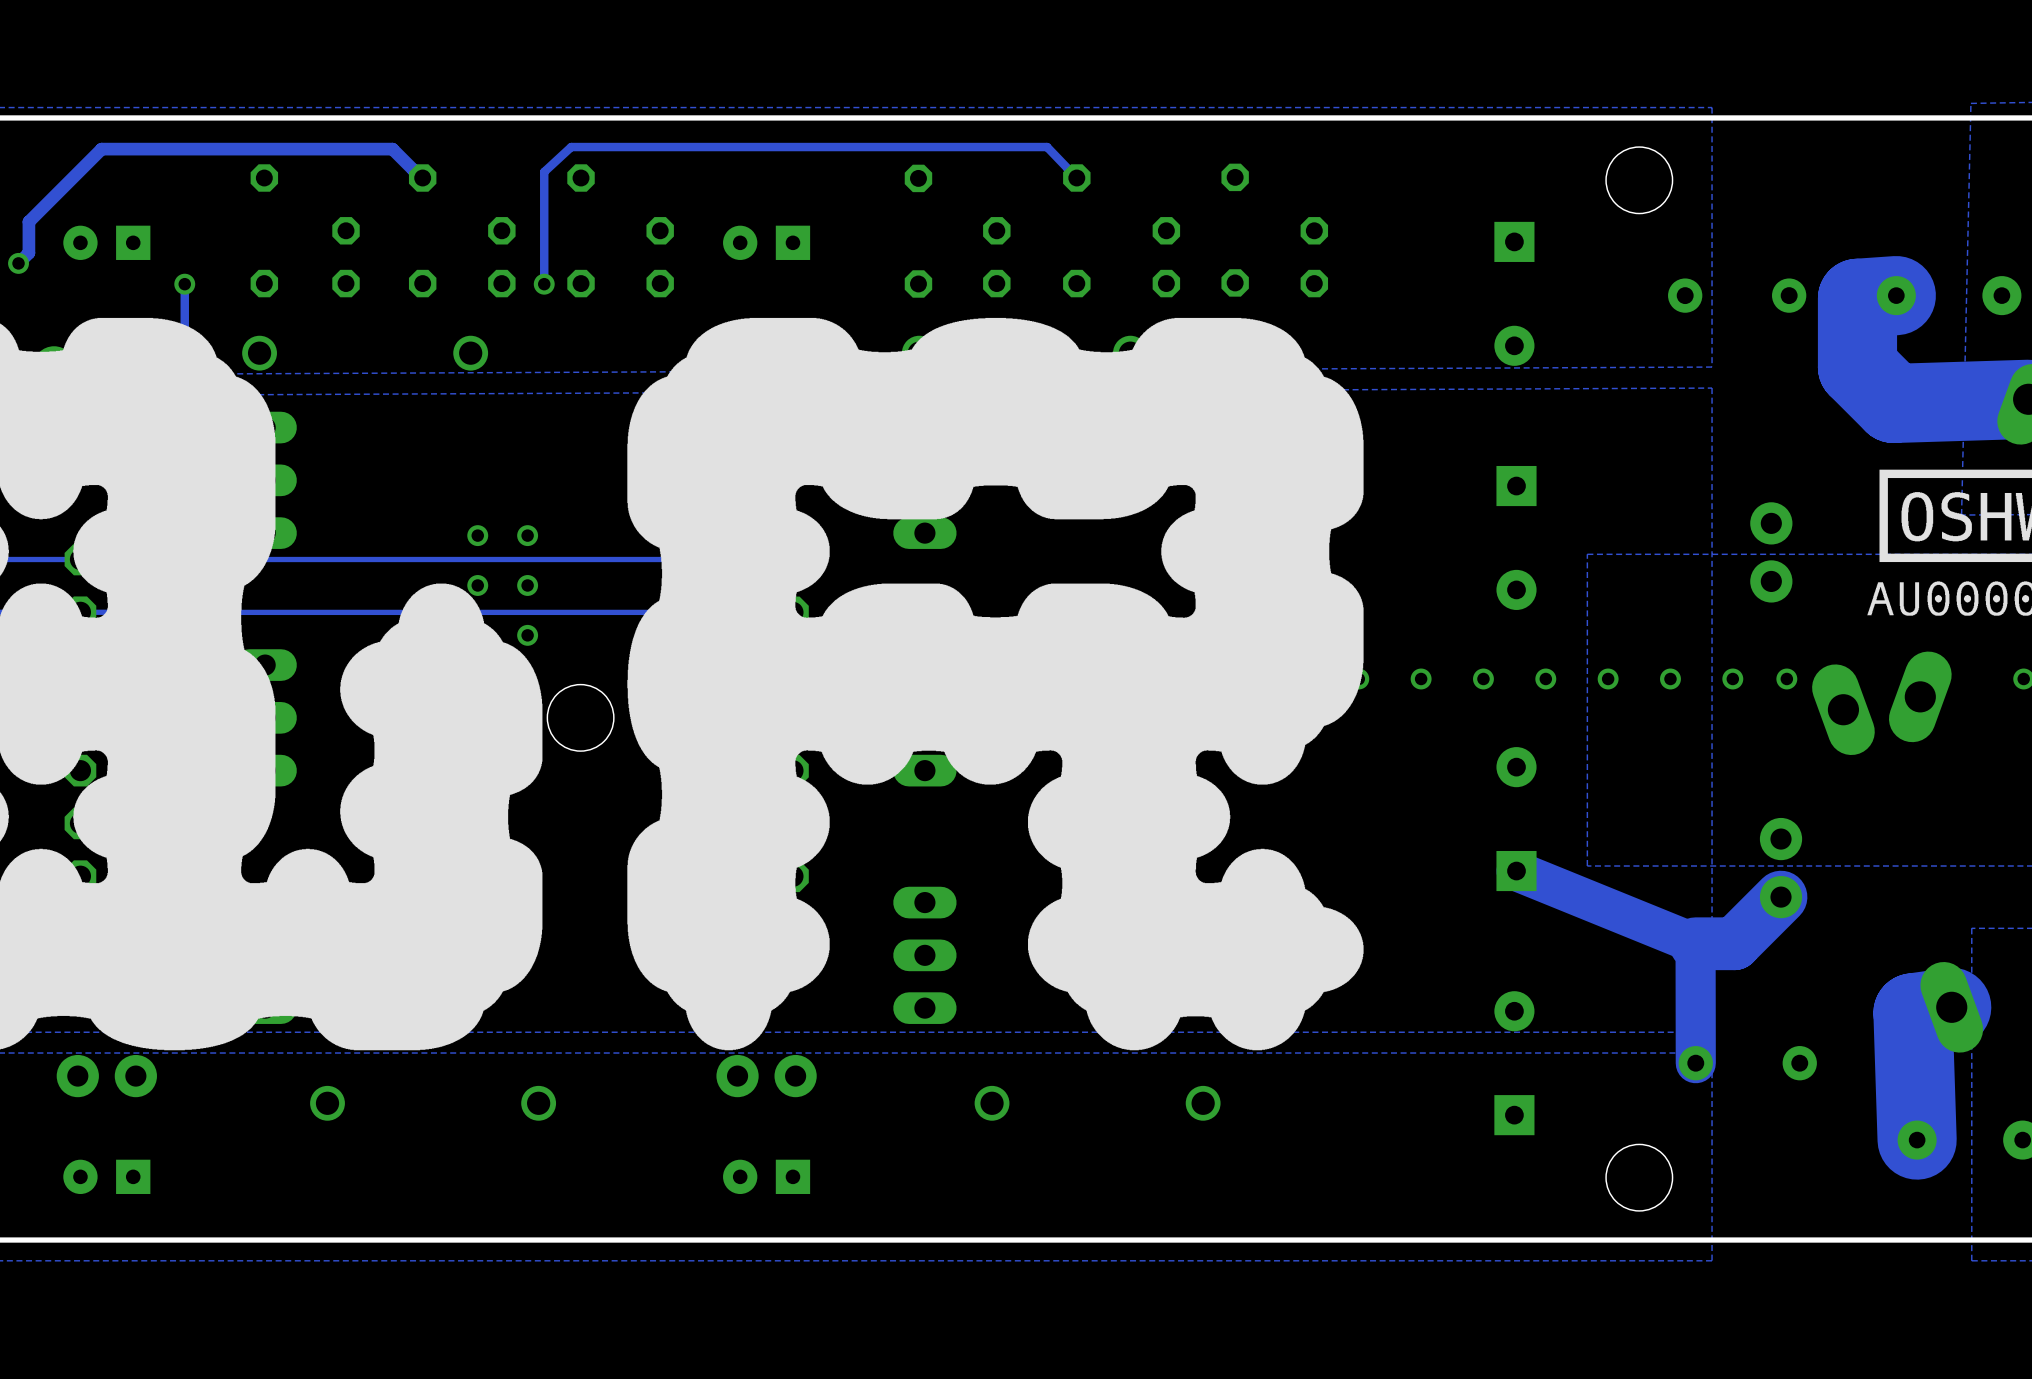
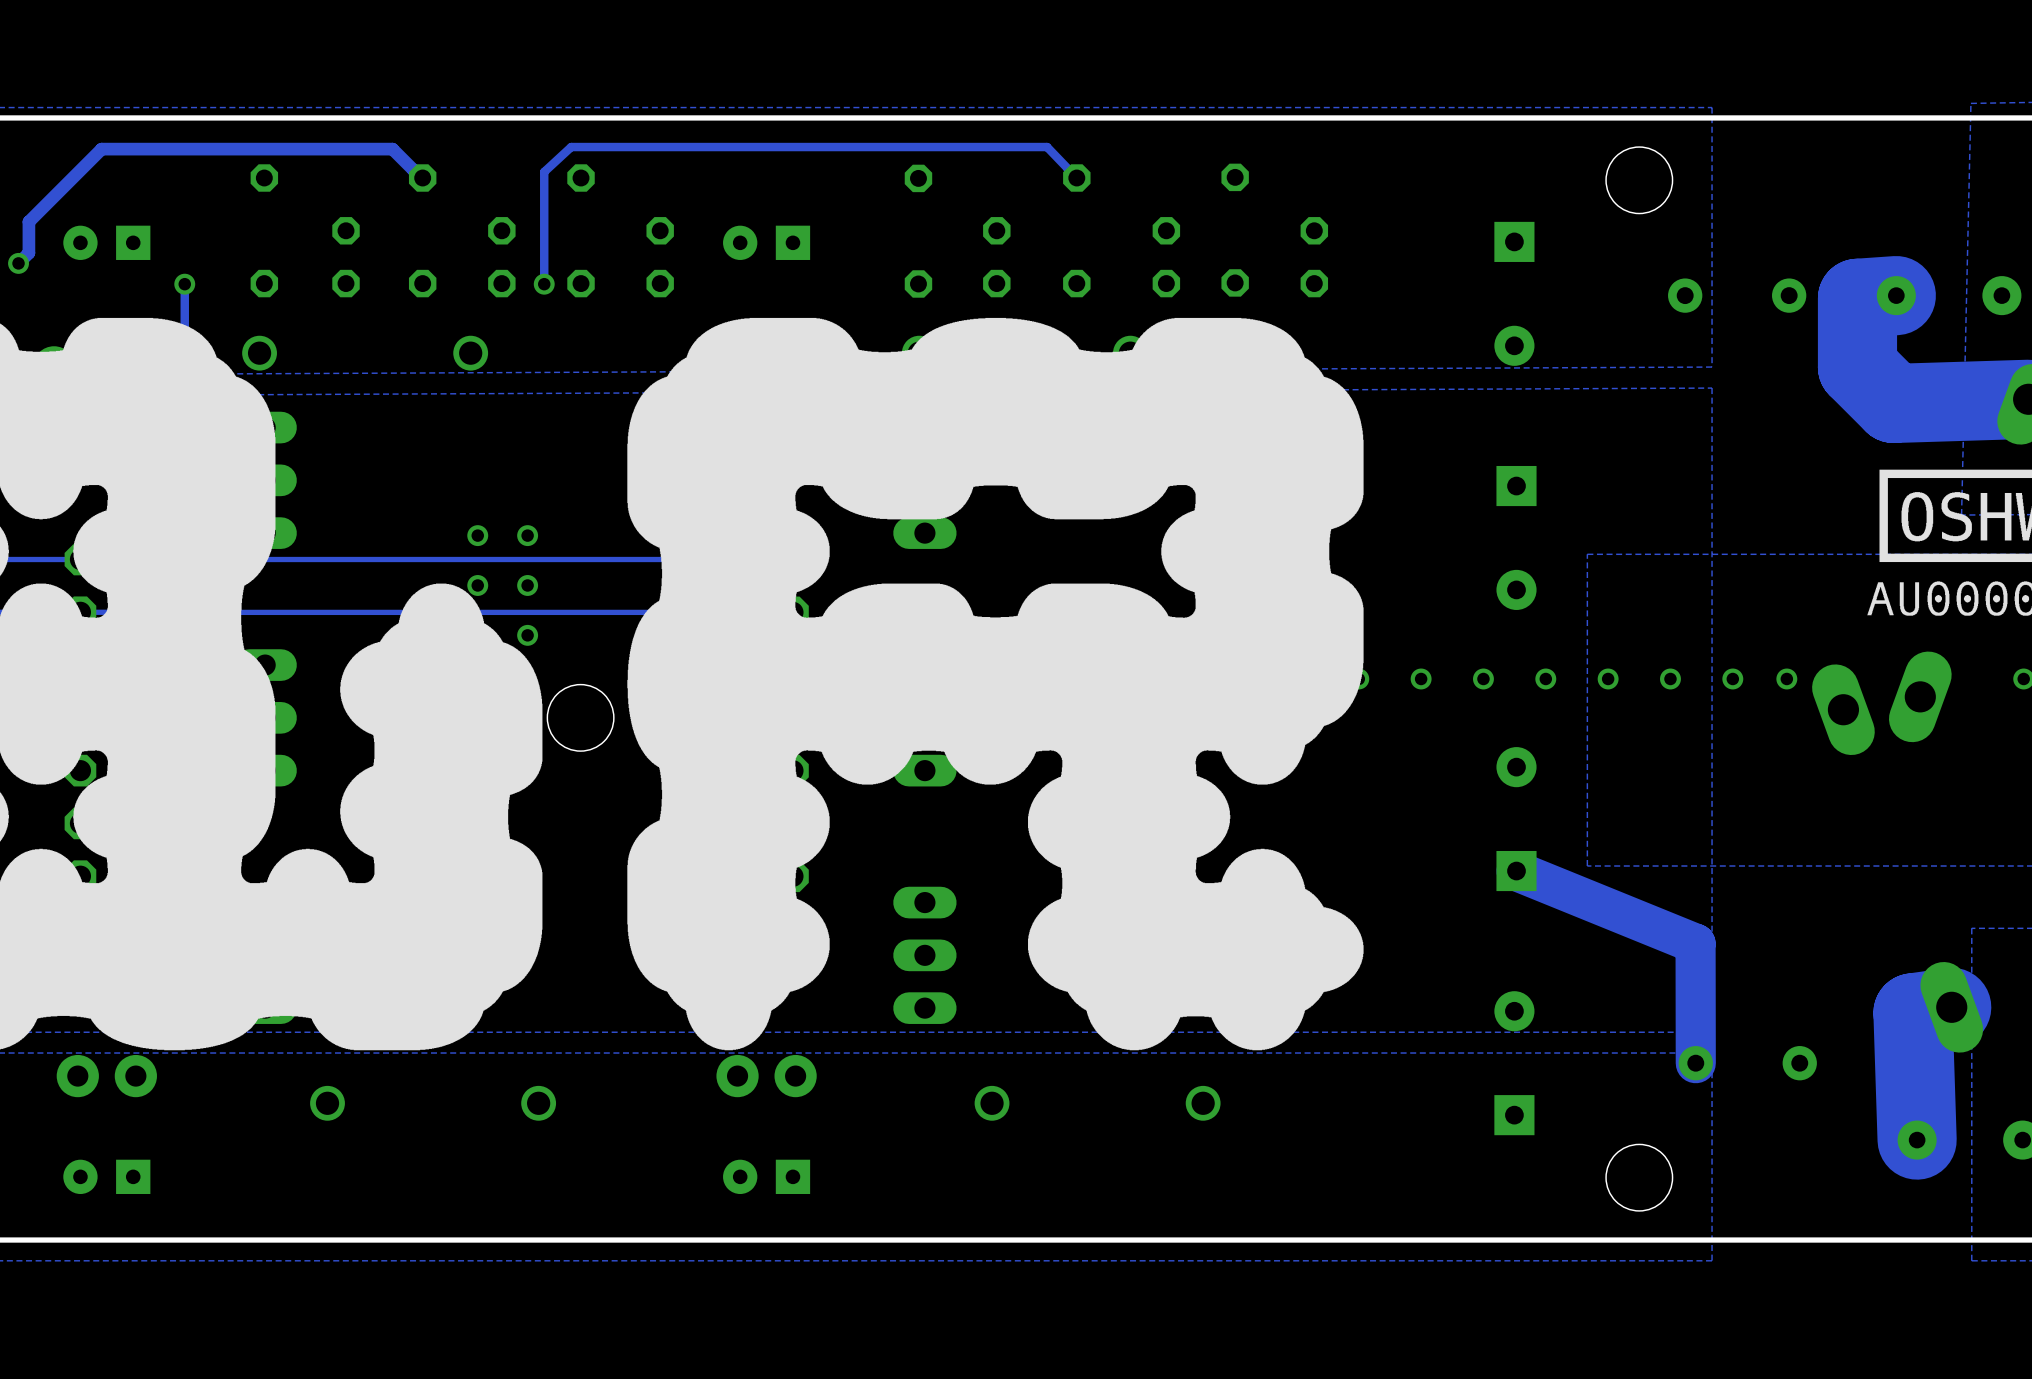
part: (1771, 552) -> none
part: (1781, 868) -> none
track: (1781, 897) (1734, 943) (1695, 943) -> none

